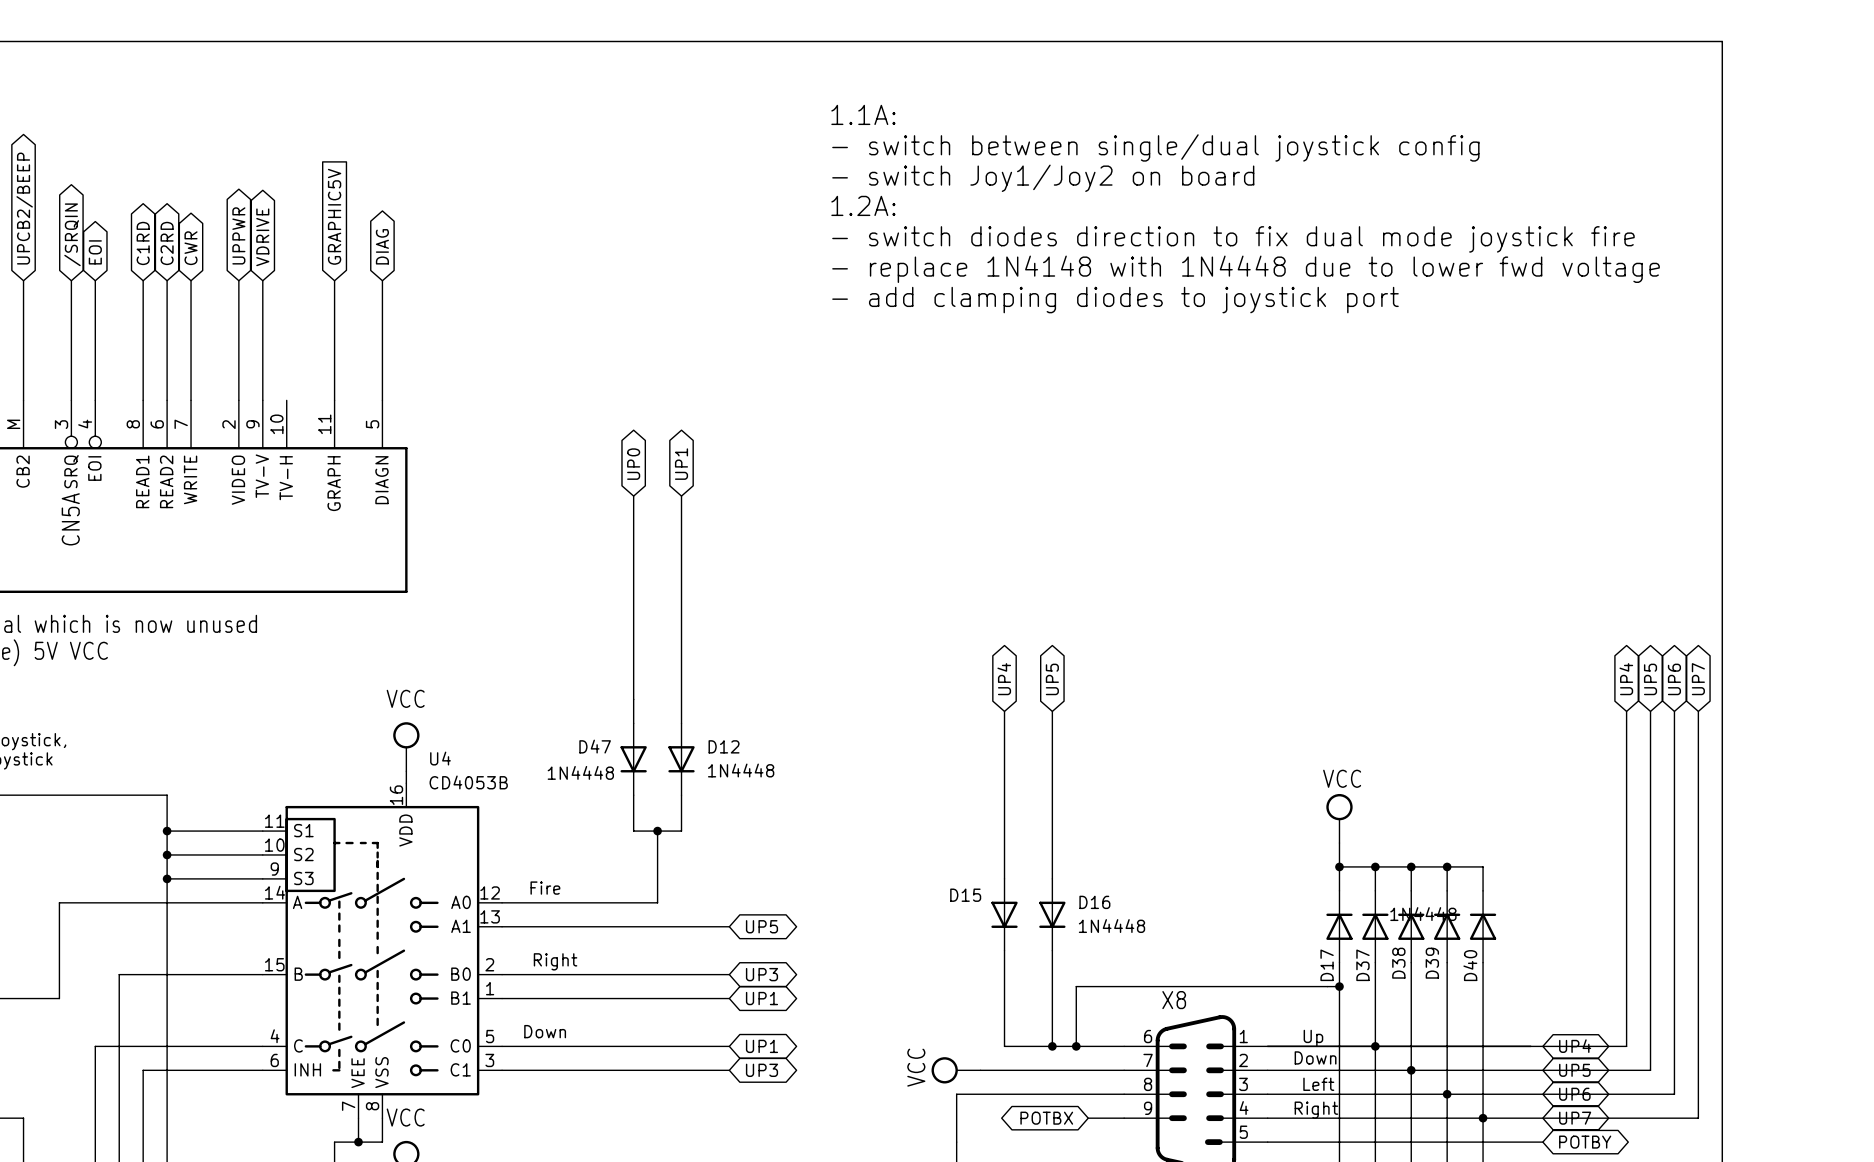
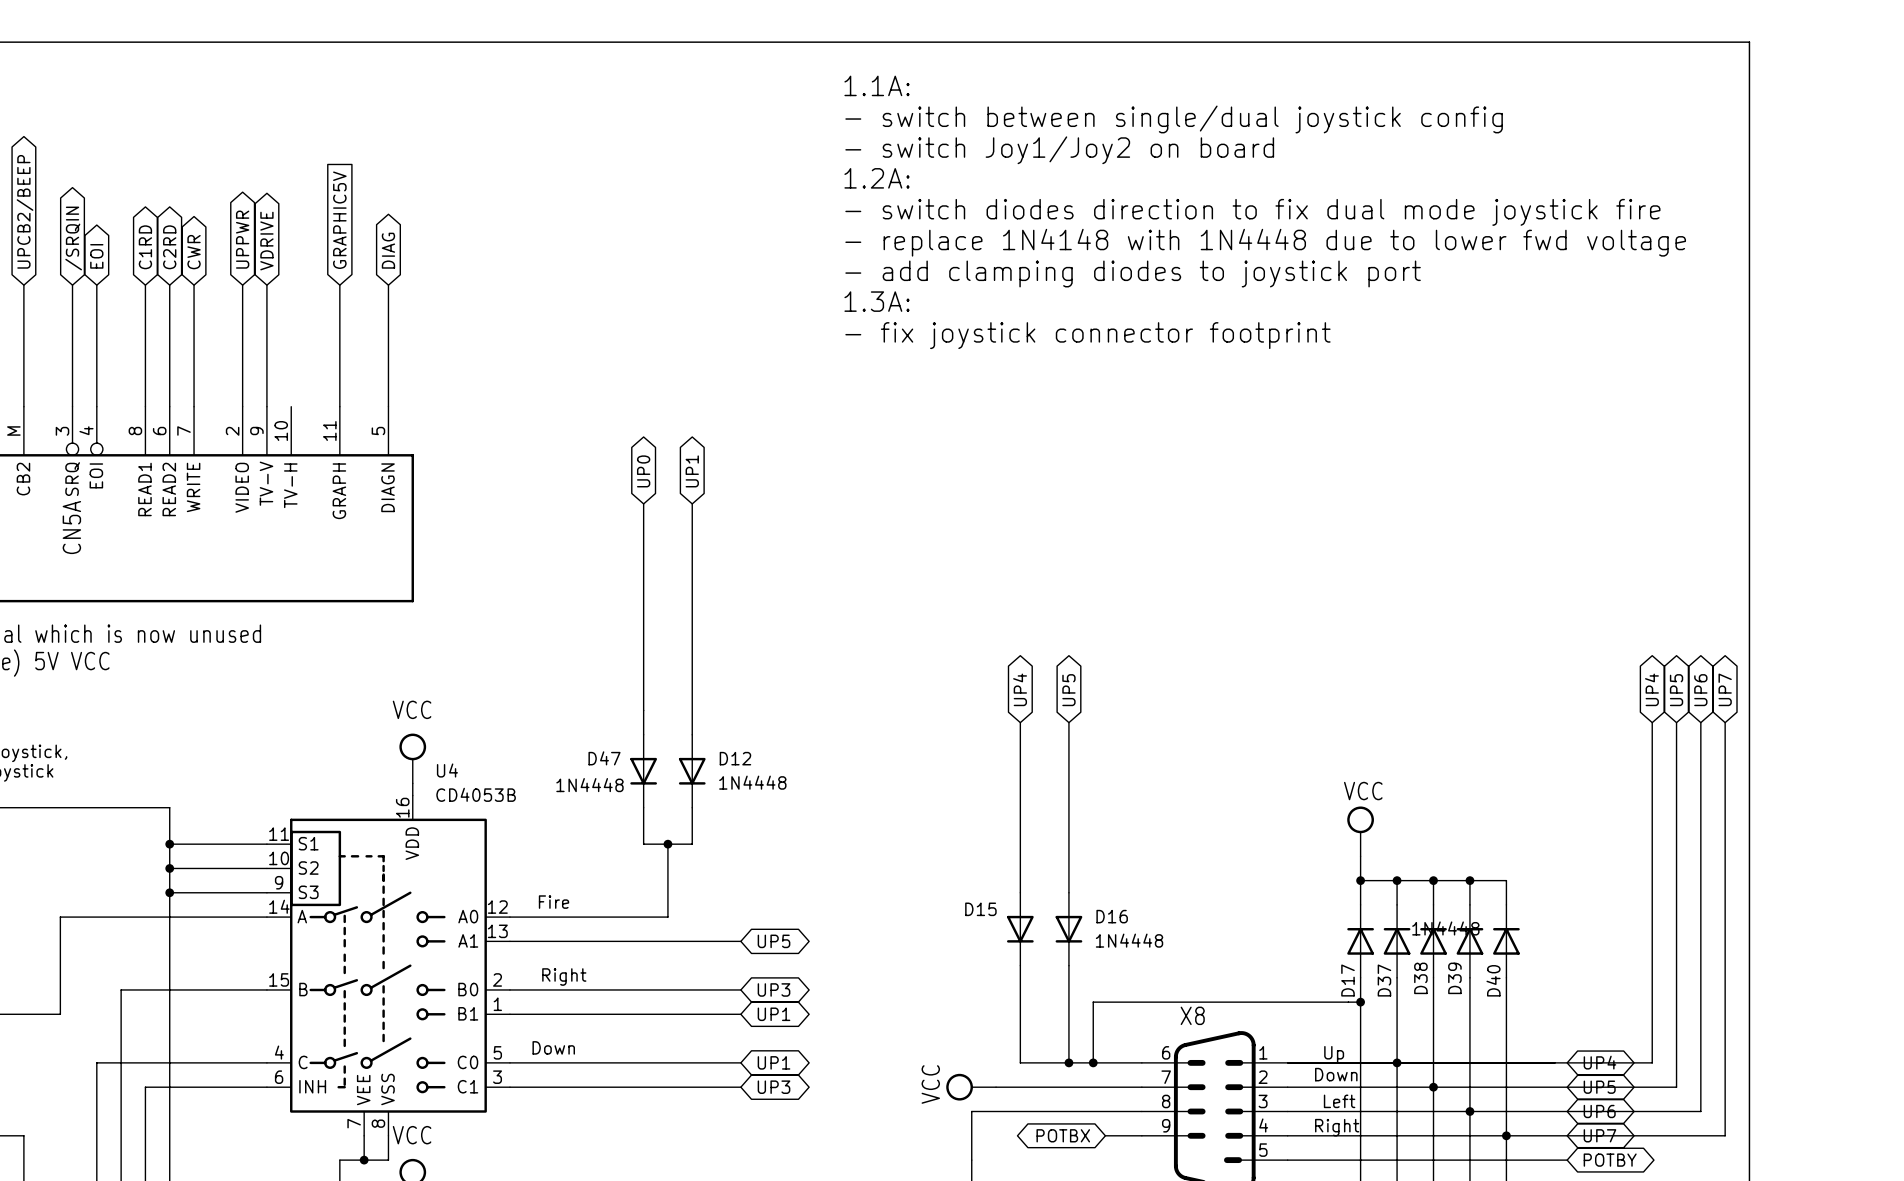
text: none -> 1.1A: (877, 85)
text: 1.1A: (863, 114) -> - switch between single/dual joystick config (1174, 119)
text: - switch between single/dual joystick config (1155, 147) -> - switch Joy1/Joy2 on board (1059, 150)
text: - switch Joy1/Joy2 on board (1043, 178) -> 1.2A: (877, 178)
text: 1.2A: (863, 205) -> - switch diodes direction to fix dual mode joystick fire (1252, 212)
text: - switch diodes direction to fix dual mode joystick fire (1233, 239) -> - replace 1N4148 with 1N4448 due to lower fwd voltage (1265, 242)
text: - replace 1N4148 with 1N4448 due to lower fwd voltage (1246, 269) -> - add clamping diodes to joystick port (1133, 273)
text: - add clamping diodes to joystick port (1115, 300) -> 1.3A: (877, 301)
text: none -> - fix joystick connector footprint (1087, 335)

